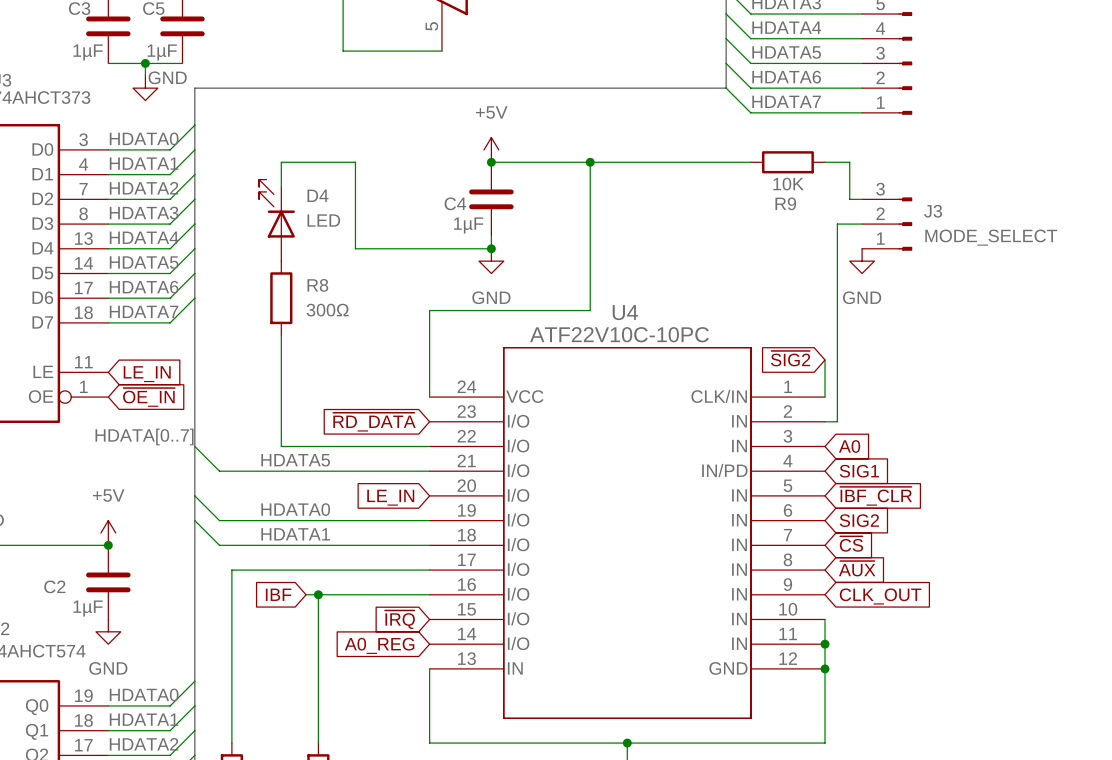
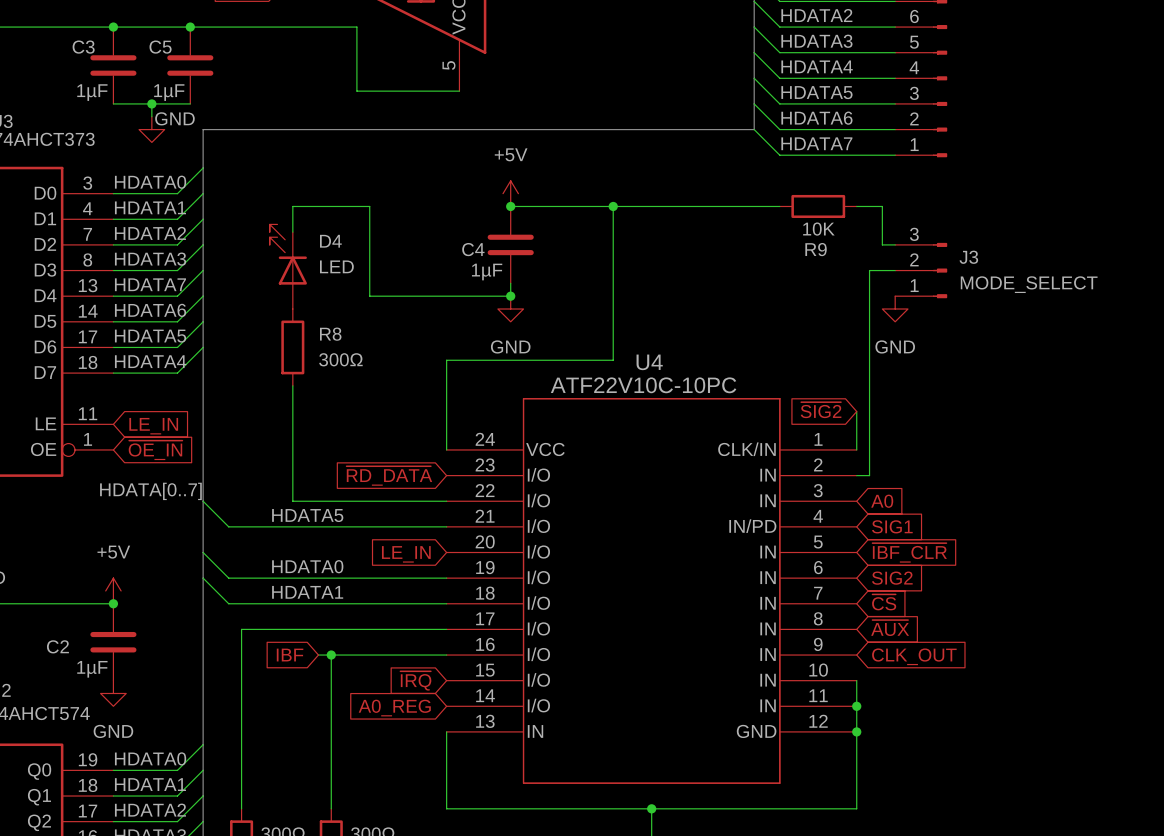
label: HDATA4 (144, 237) -> HDATA7 (150, 284)
label: HDATA5 (144, 262) -> HDATA6 (150, 310)
label: HDATA6 (144, 287) -> HDATA5 (150, 336)
label: HDATA7 (144, 311) -> HDATA4 (150, 361)

